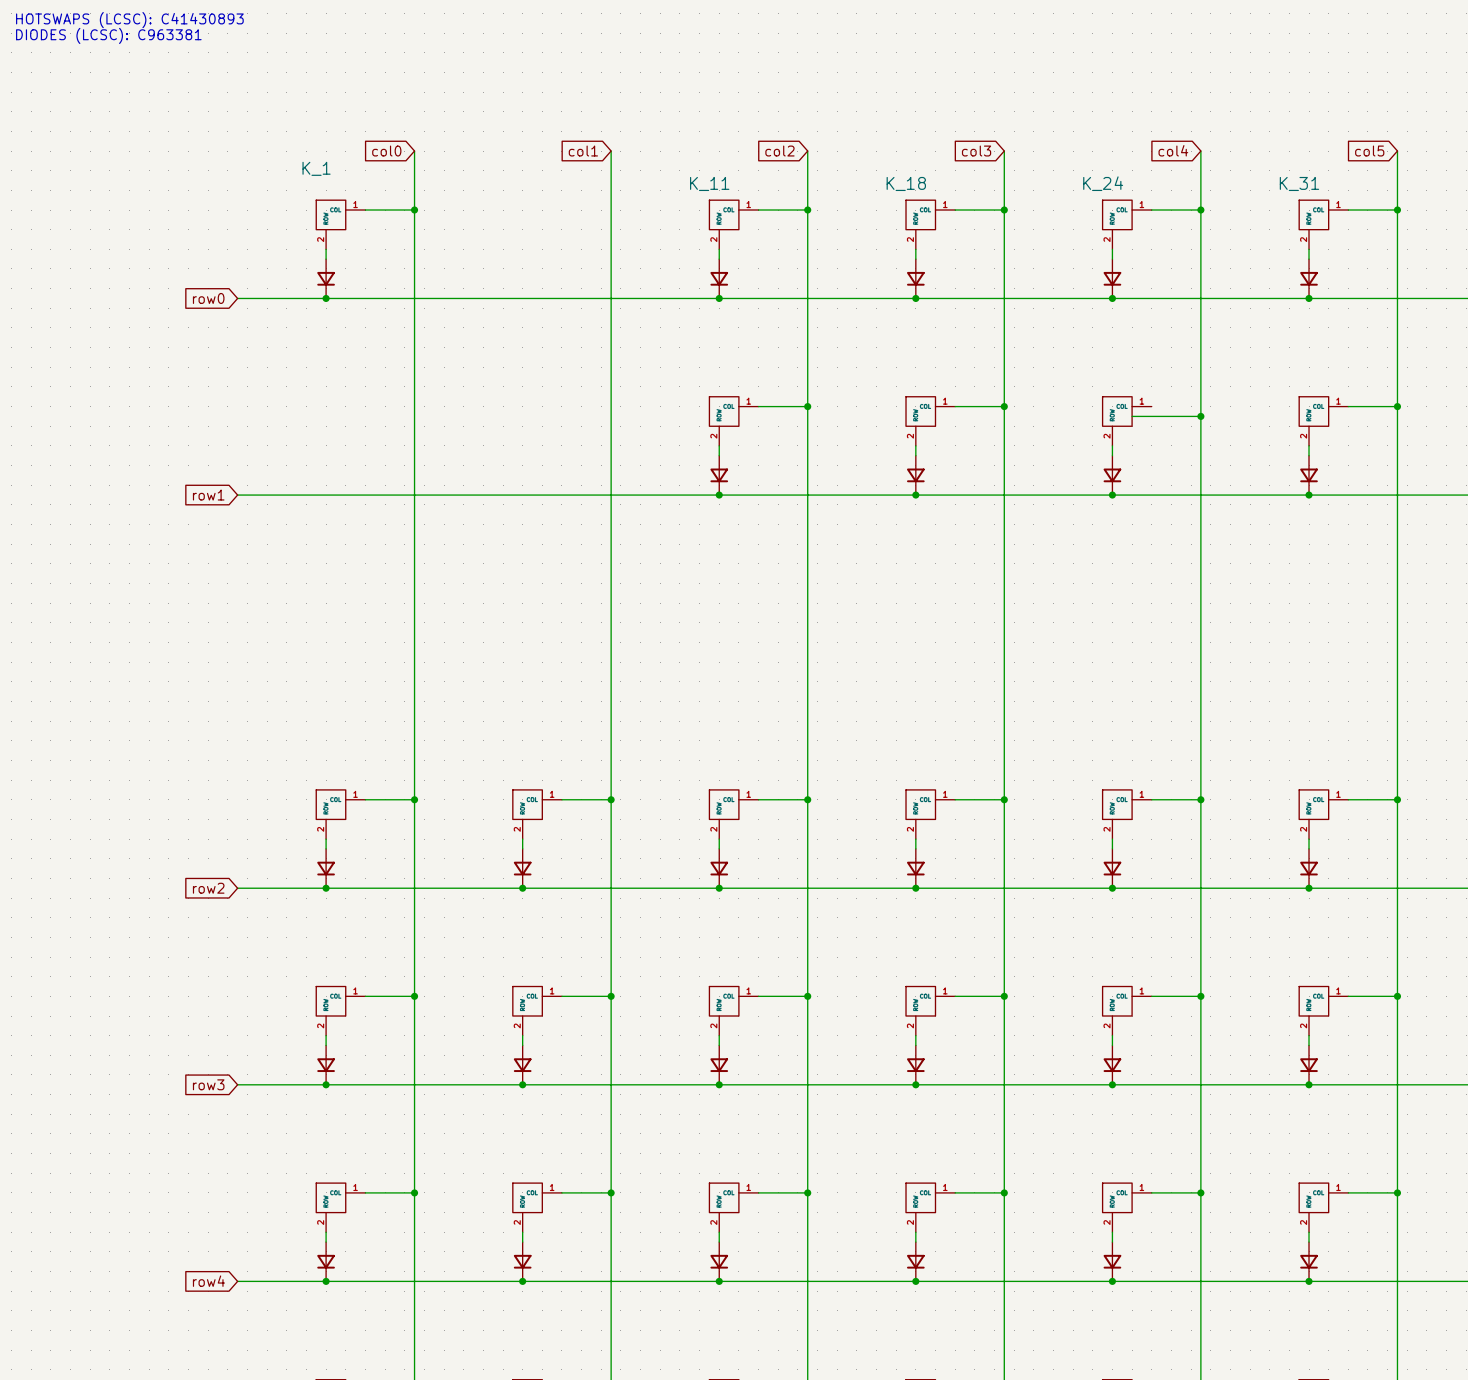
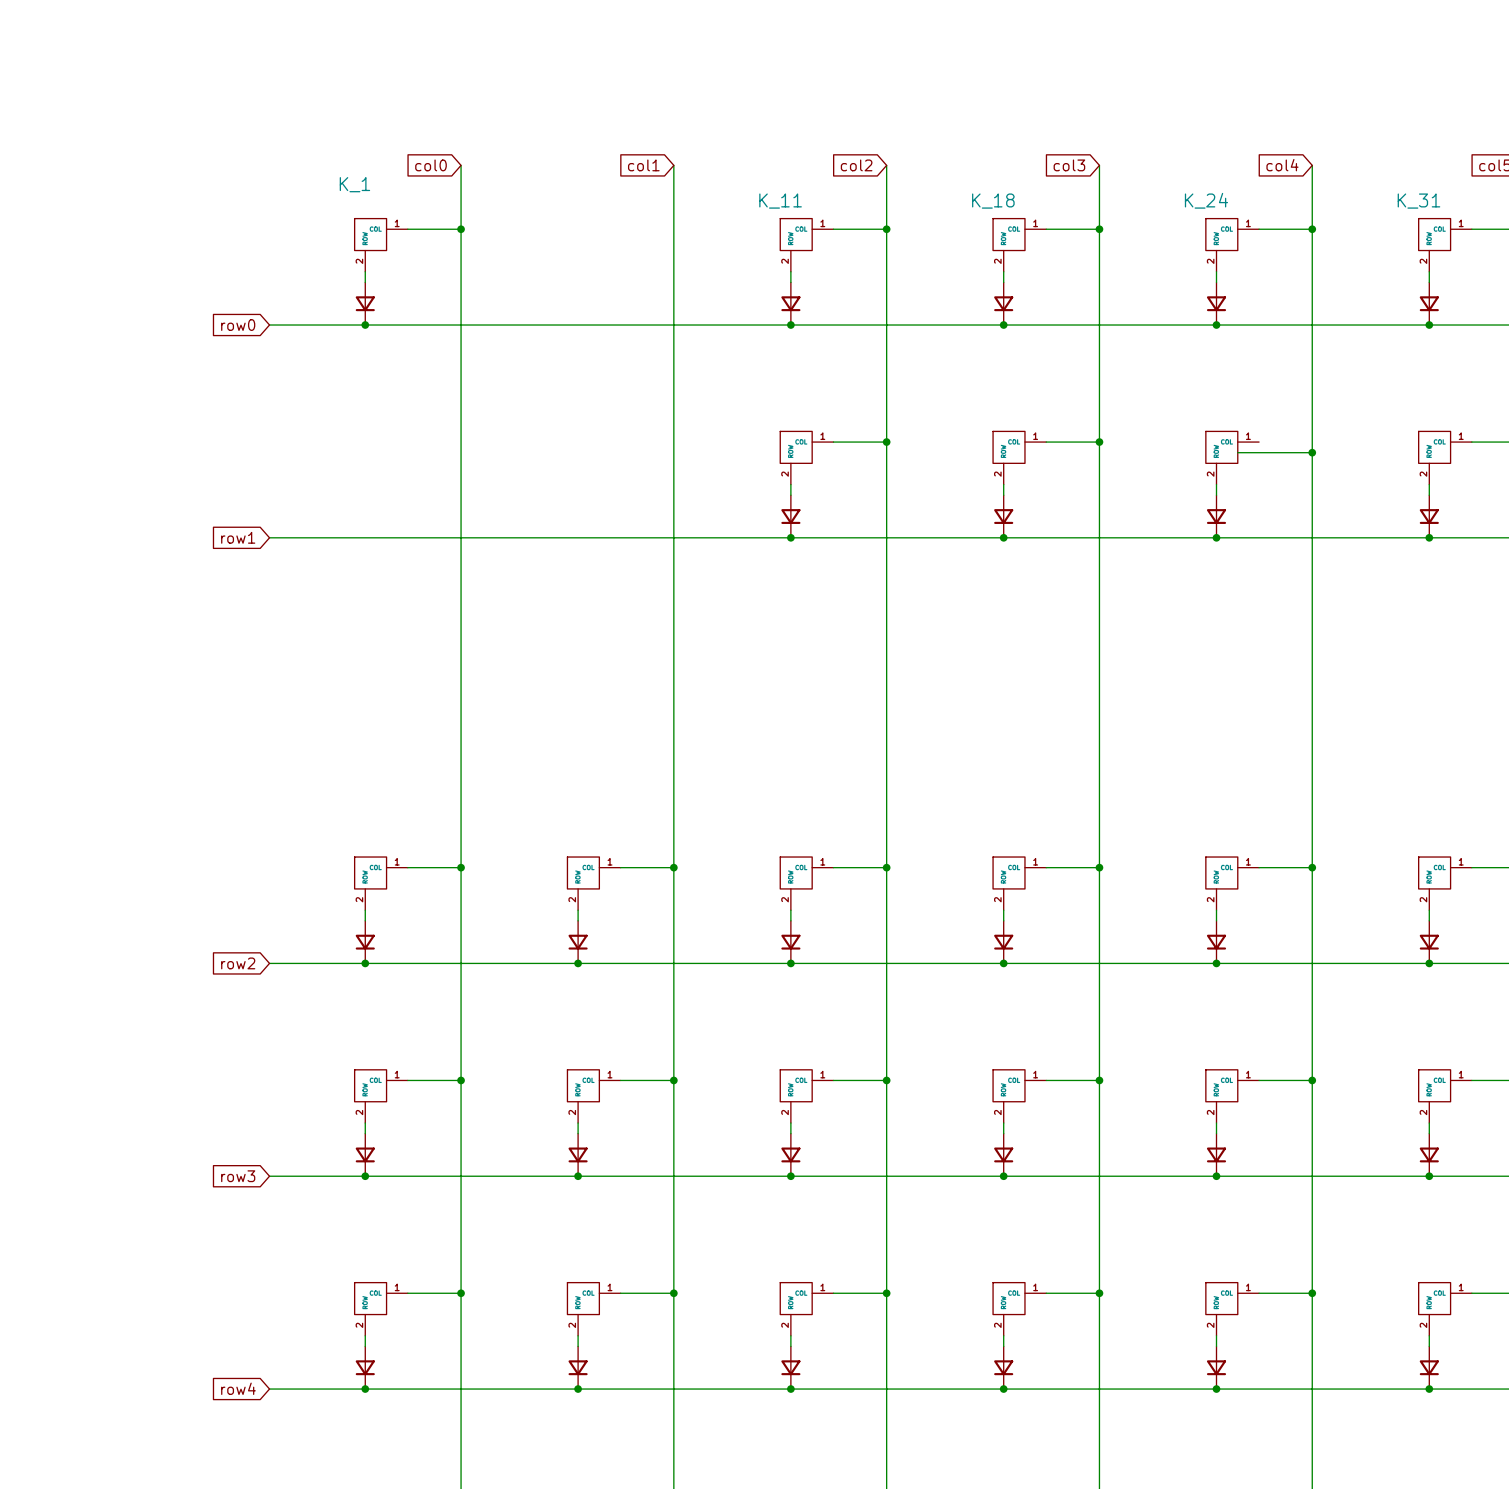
text: HOTSWAPS (LCSC): C41430893 (129, 20) -> none
text: DIODES (LCSC): C963381 (108, 35) -> none

